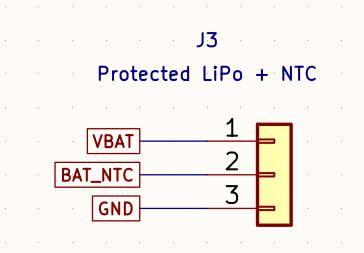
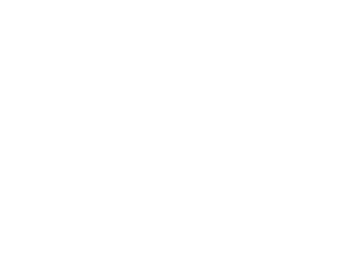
global label: VBAT (113, 141) -> none
wire: (139, 141) (207, 141) -> none
wire: (139, 174) (207, 174) -> none
J3: Protected LiPo + NTC (249, 174) -> none
global label: BAT_NTC (97, 175) -> none
global label: GND (115, 208) -> none
wire: (139, 208) (207, 208) -> none

